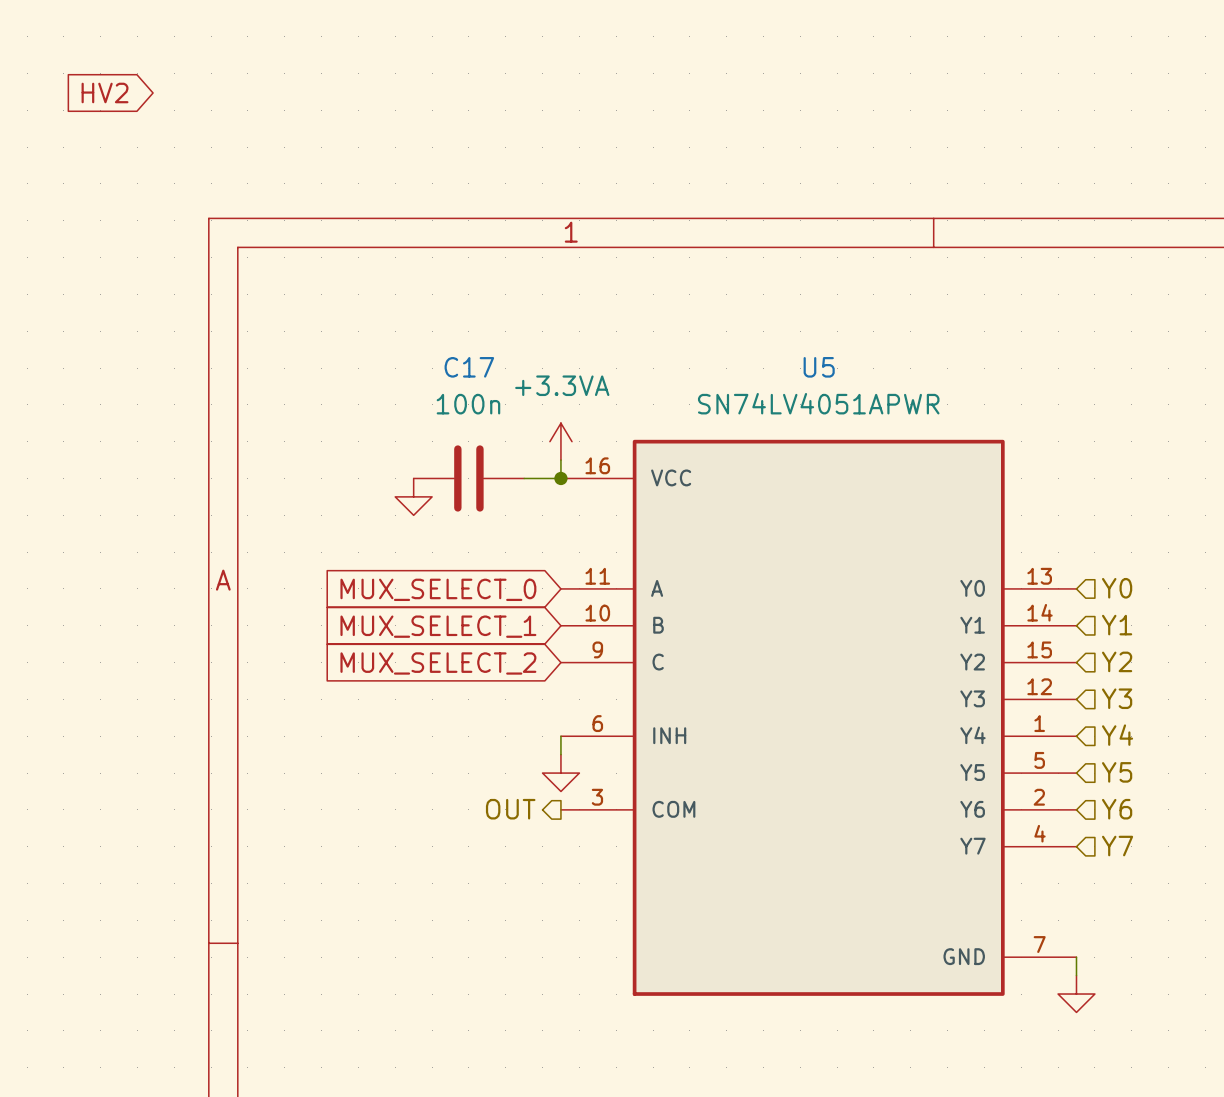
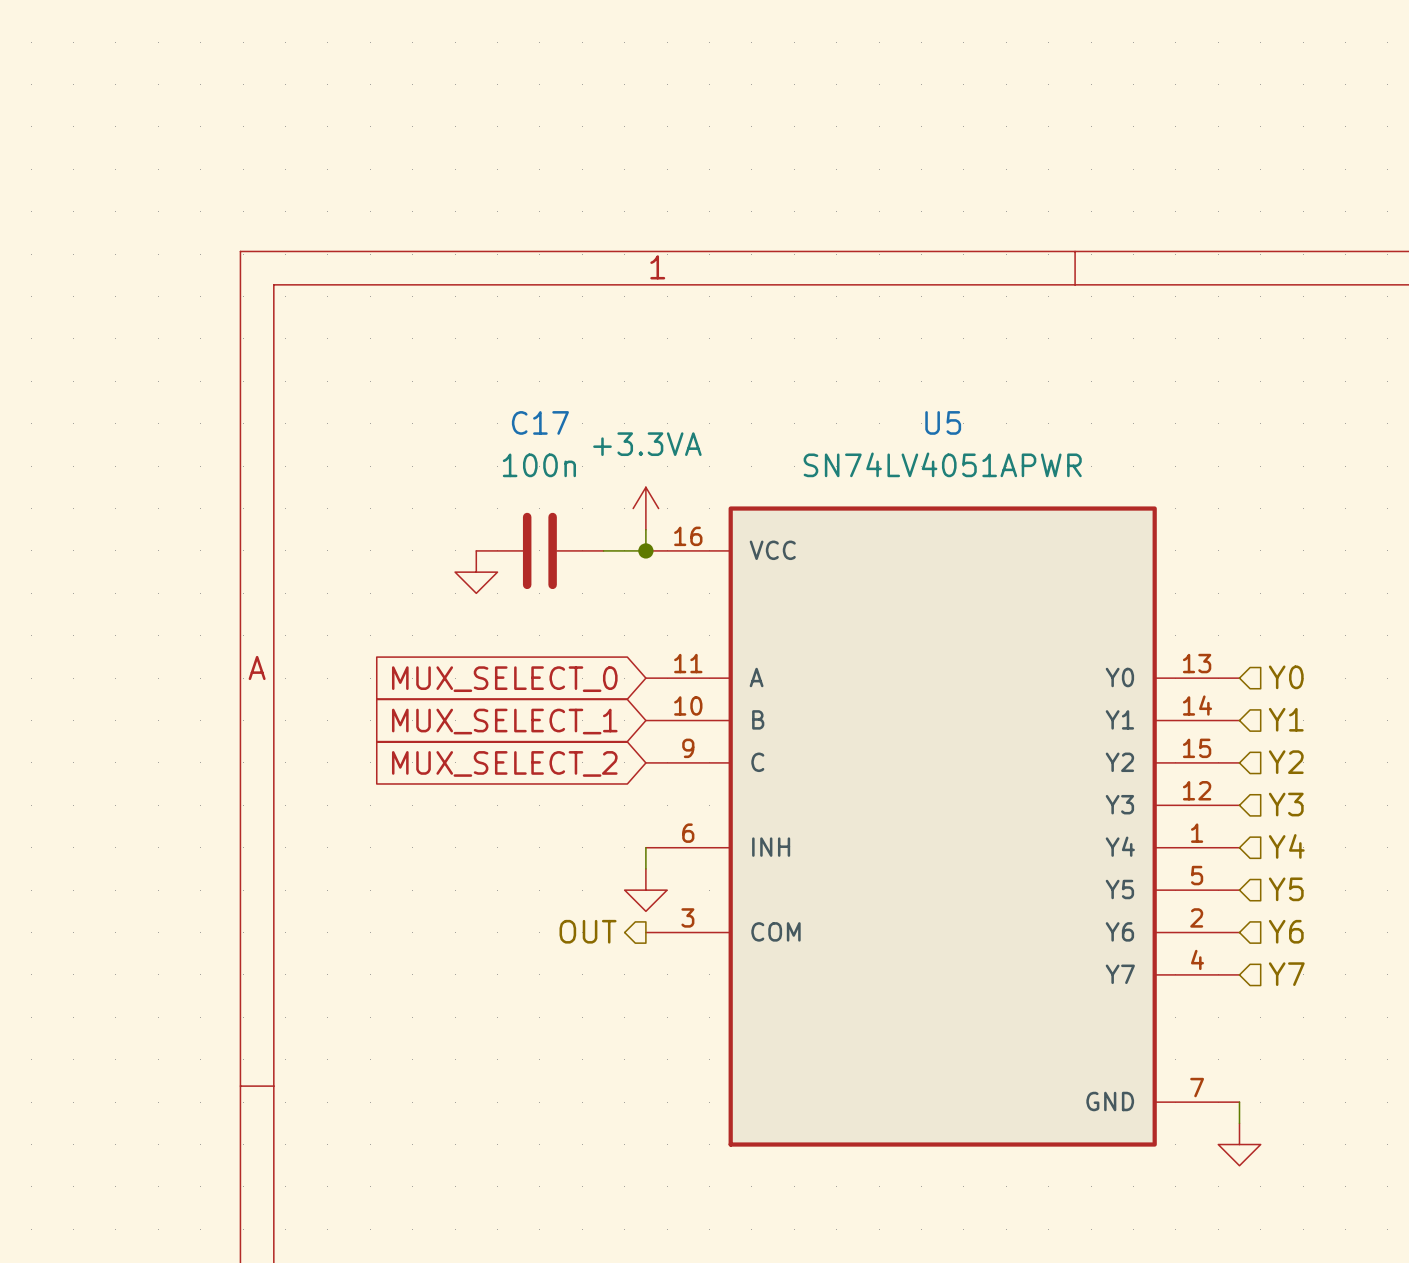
global label: HV2 (105, 92) -> none

